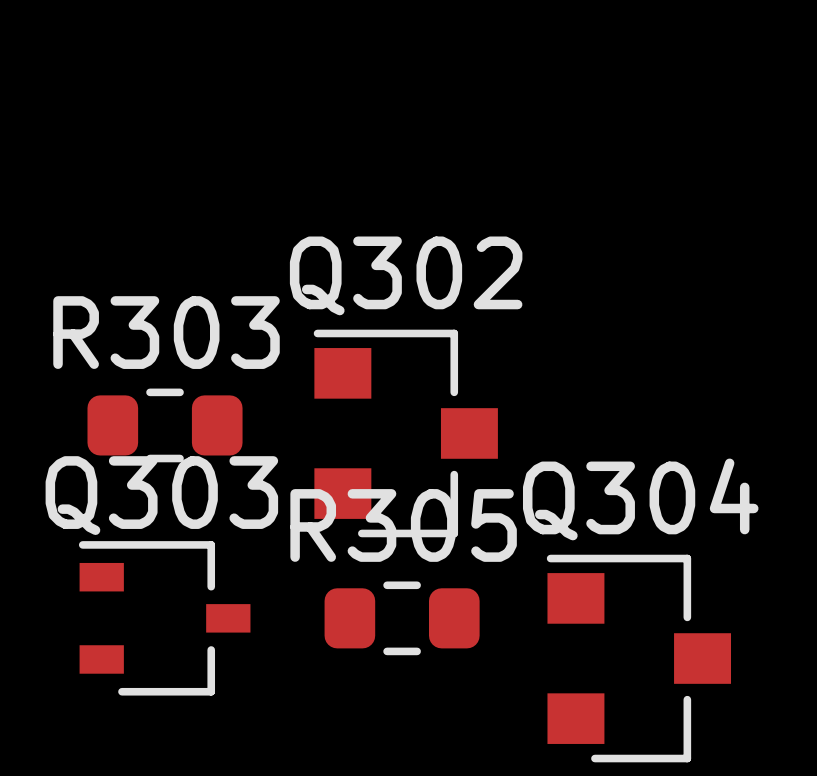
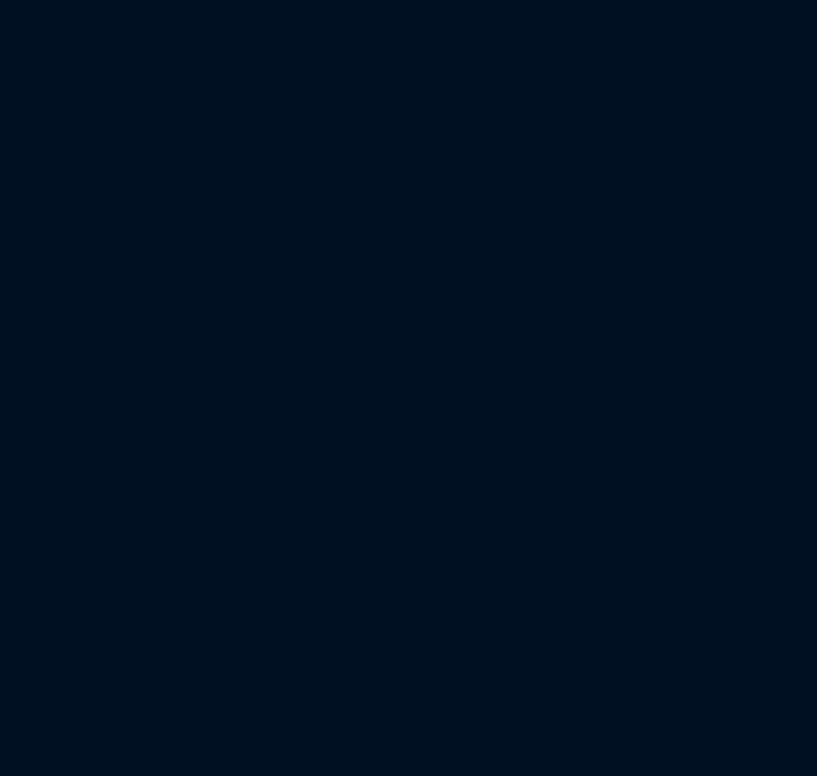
R303: (165, 425) -> none
Q302: (405, 433) -> none
Q303: (164, 618) -> none
R305: (402, 618) -> none
Q304: (638, 658) -> none

